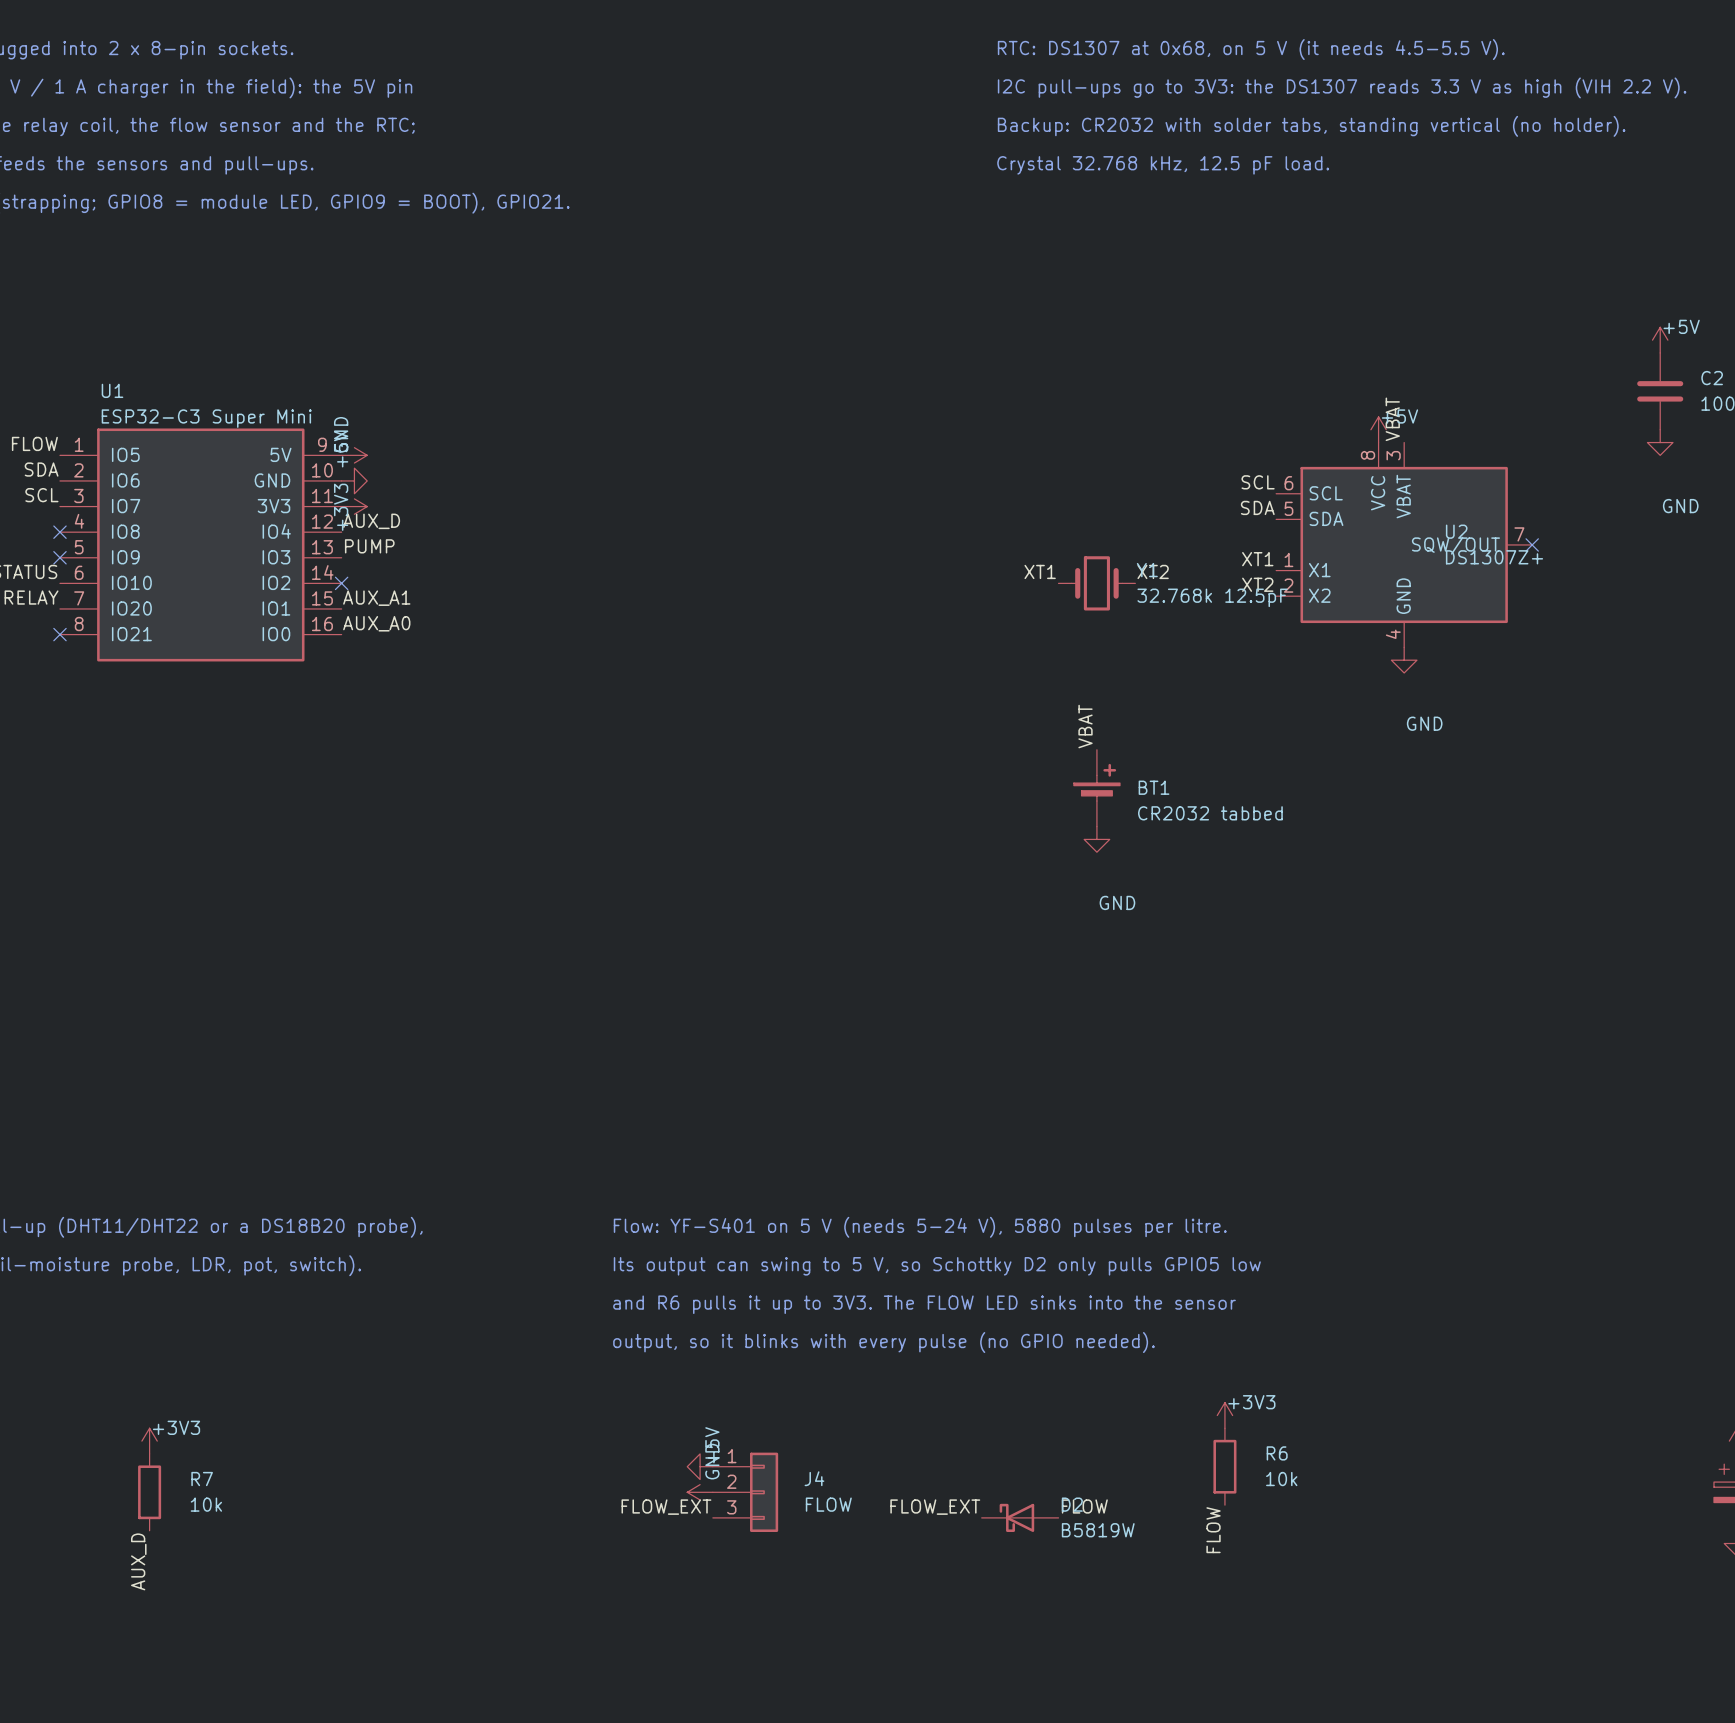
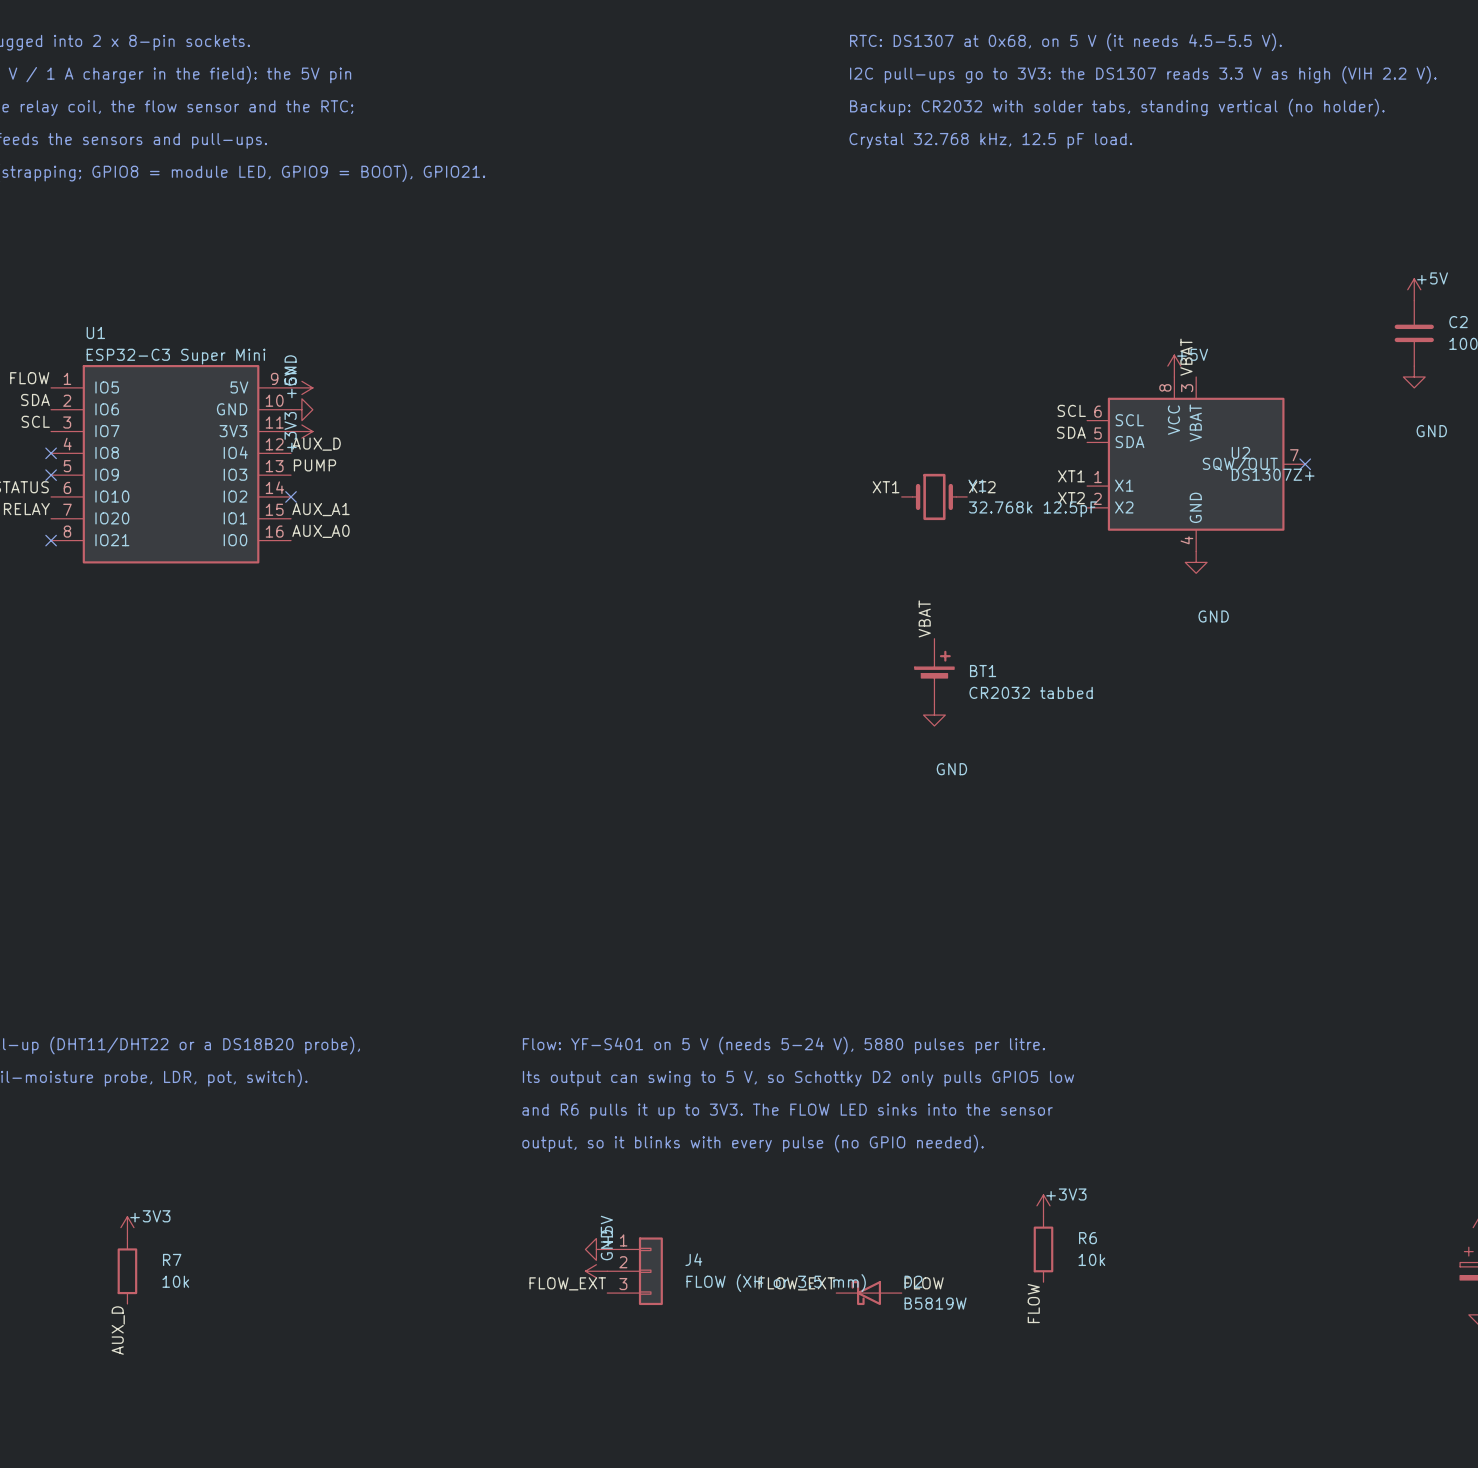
J4 value: FLOW (828, 1504) -> FLOW (XH or 3.5 mm) (776, 1283)

